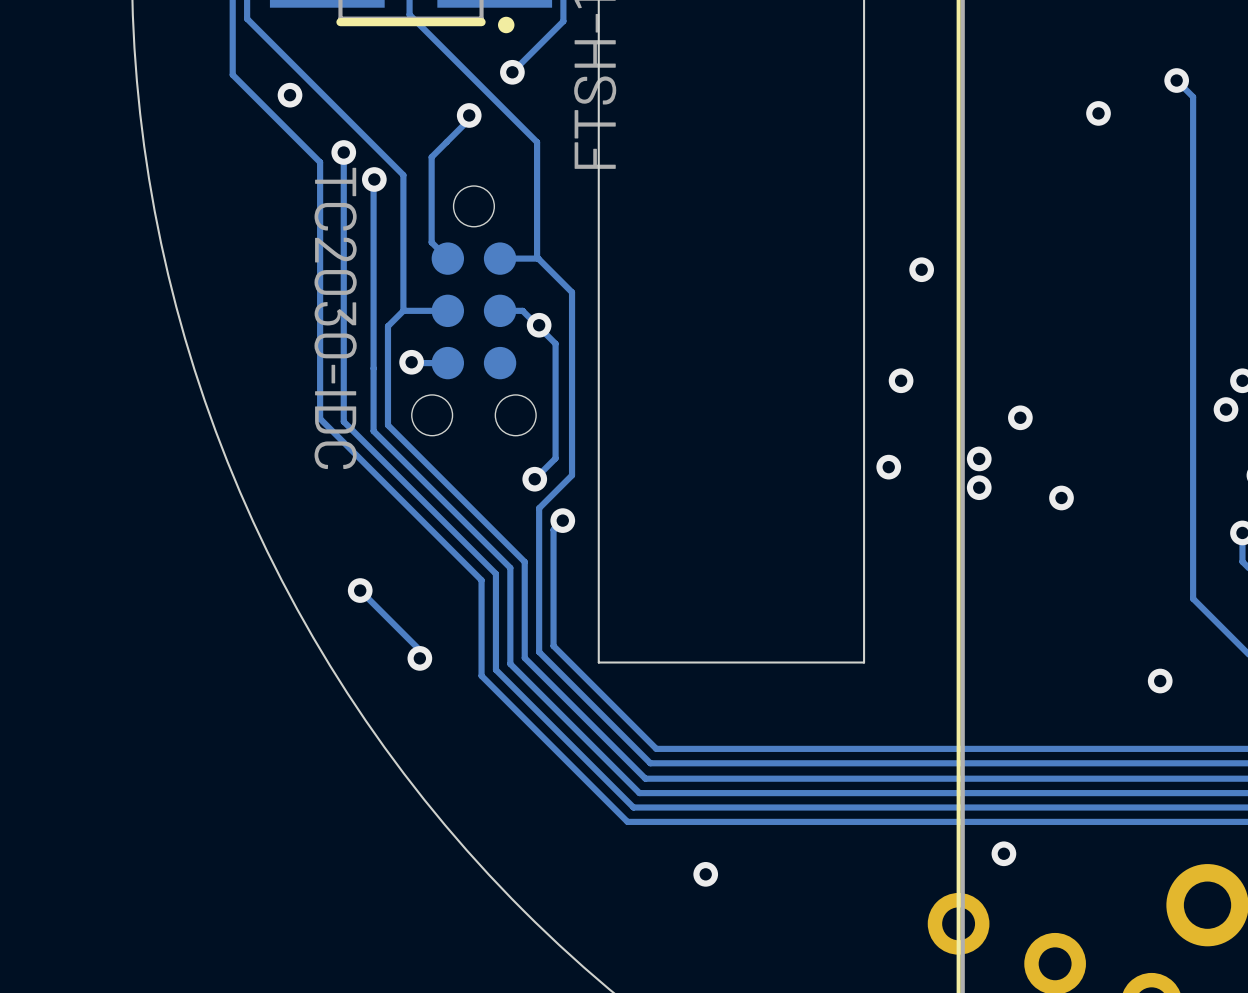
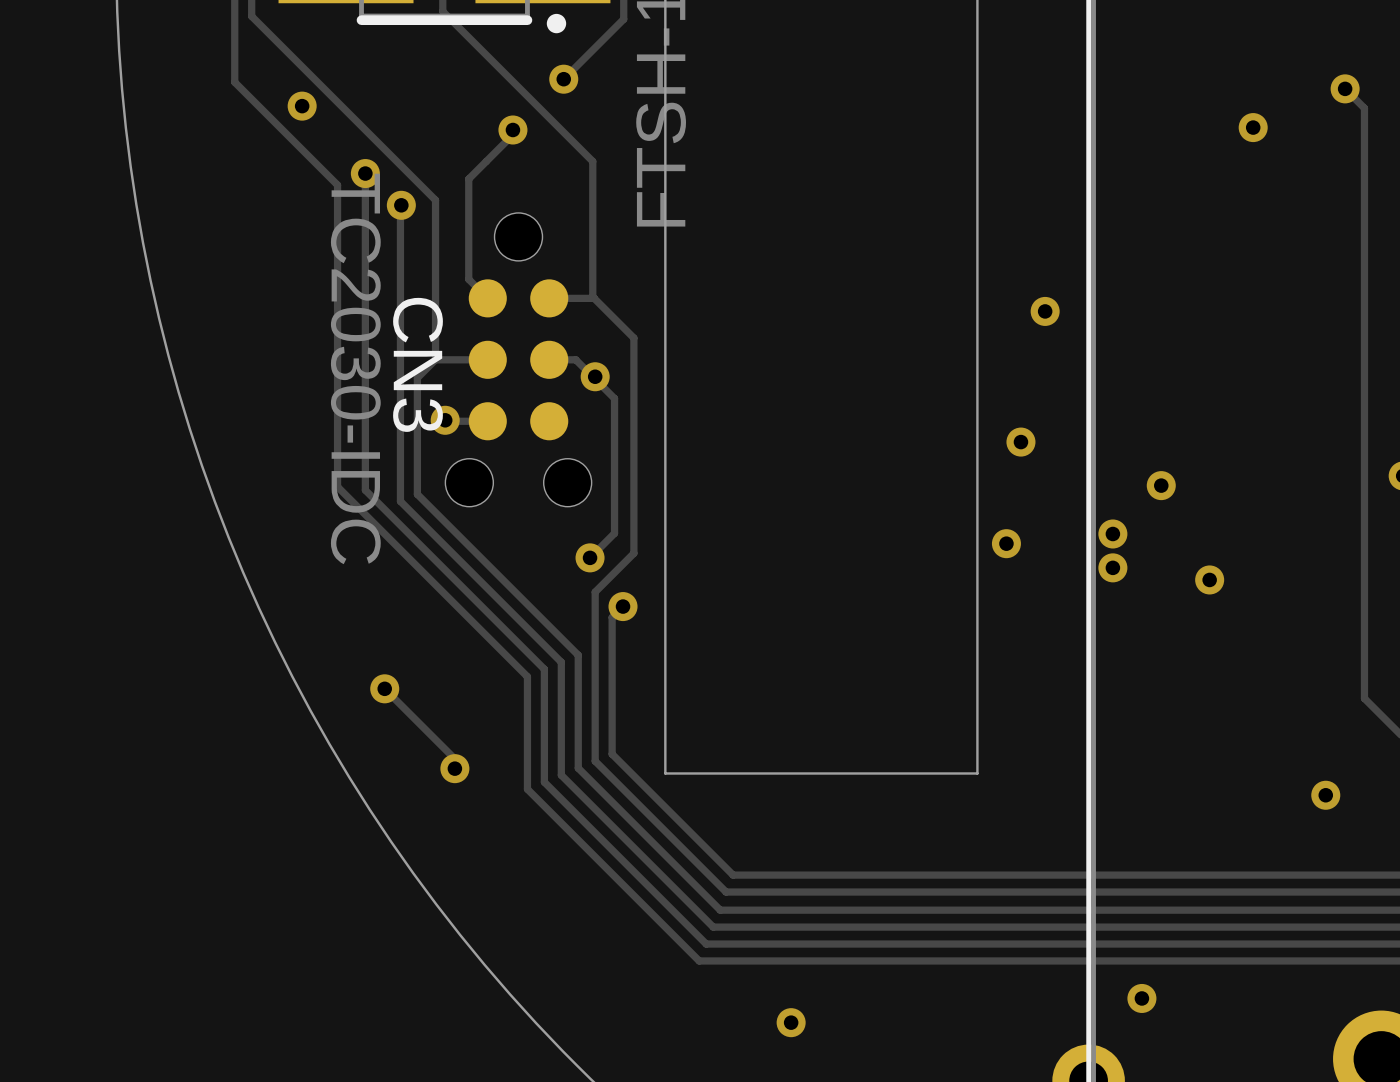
CN3 name: none -> CN3 (418, 364)

